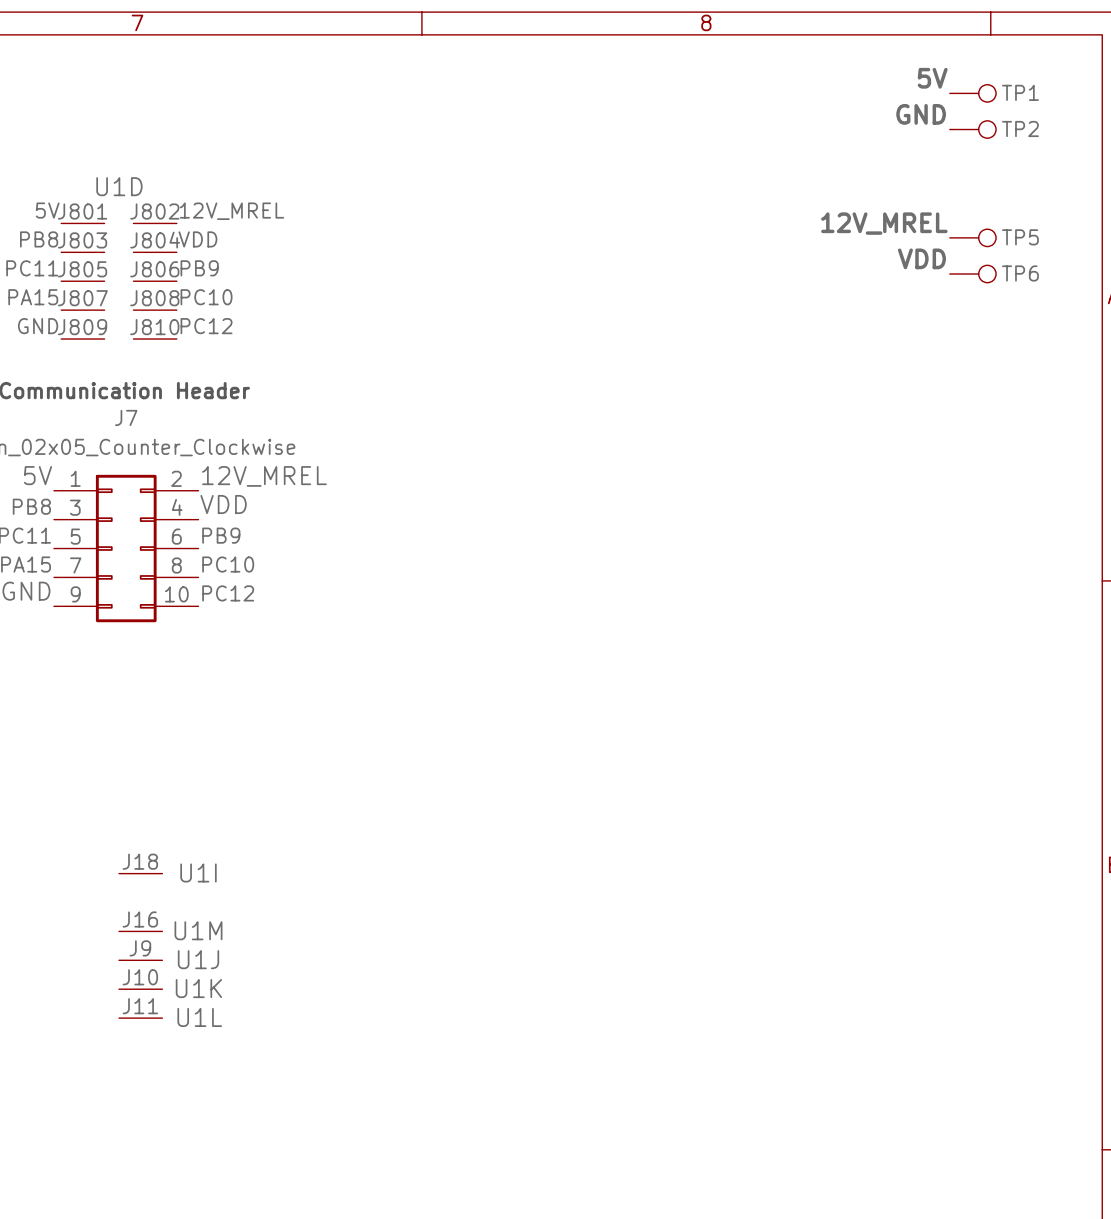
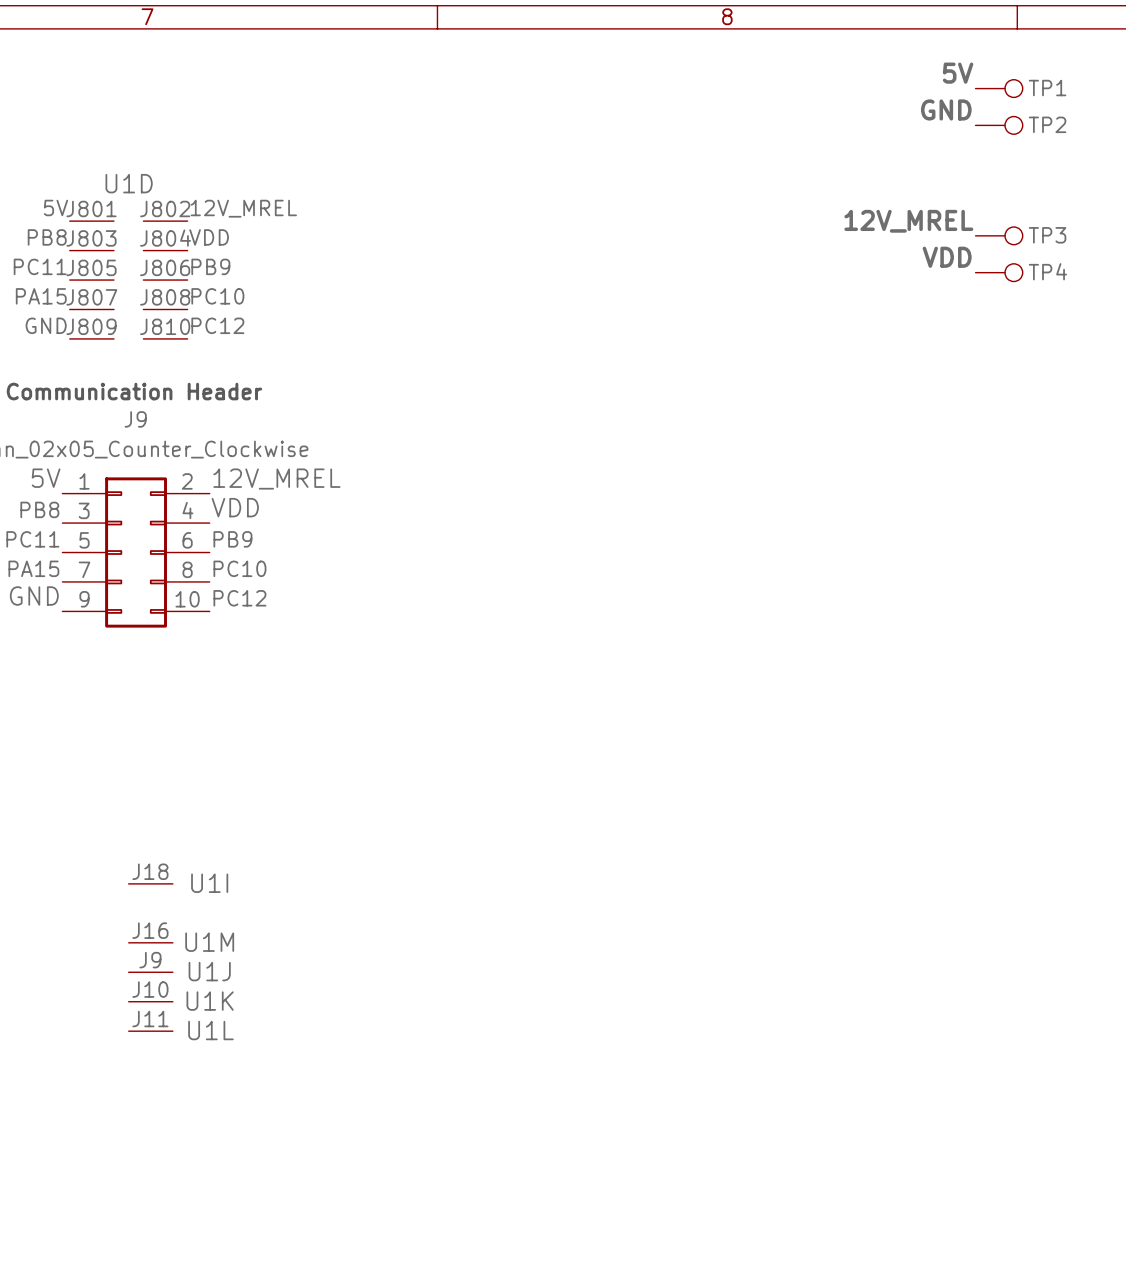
TP5 name: TP5 (1020, 237) -> TP3 (1047, 235)
TP6 name: TP6 (1020, 273) -> TP4 (1047, 271)
J7 name: J7 (126, 417) -> J9 (135, 419)

